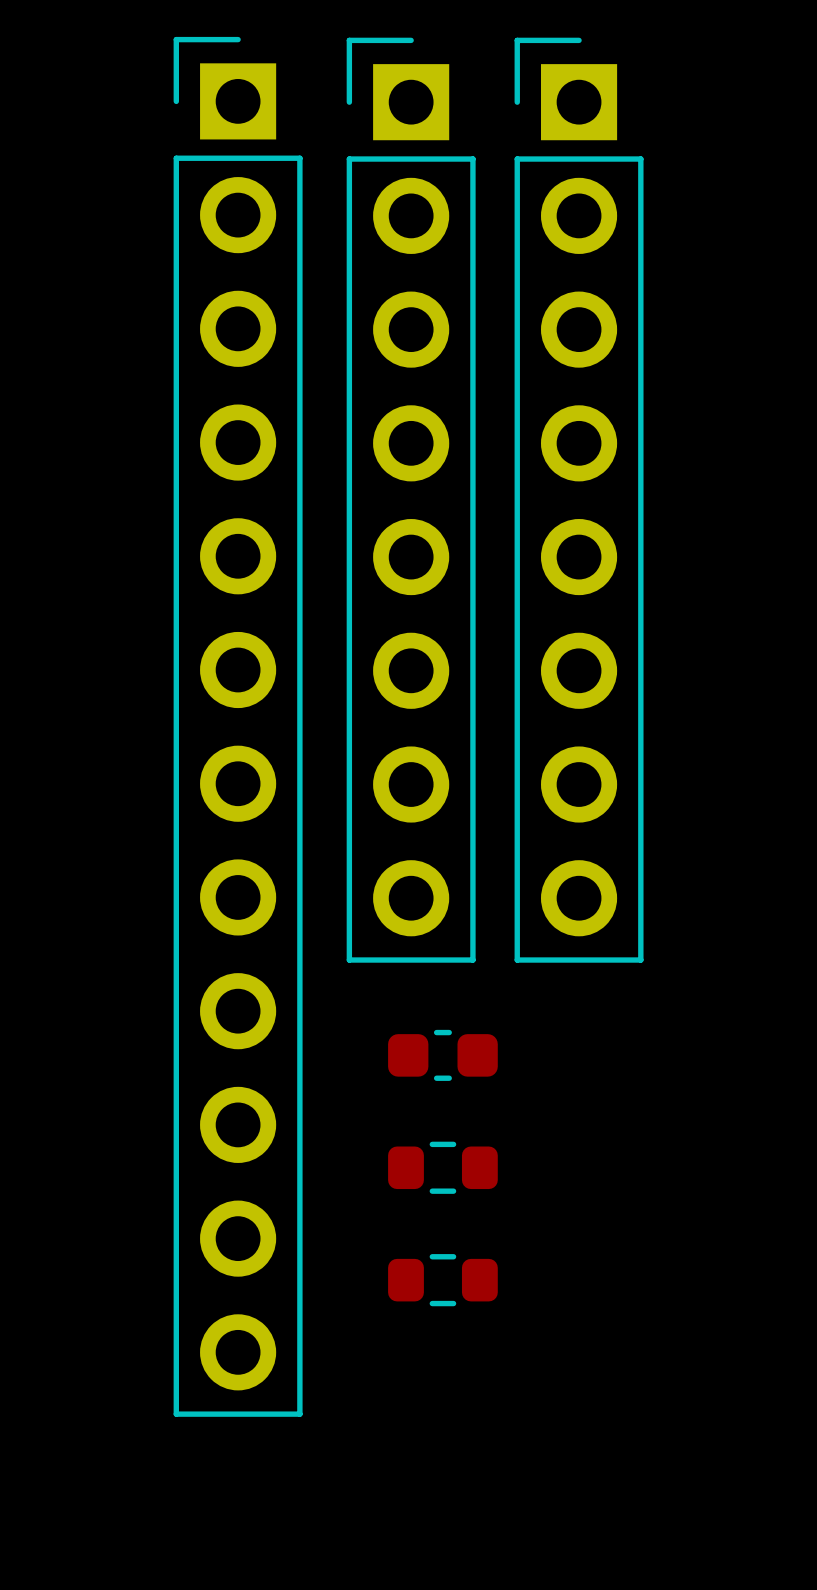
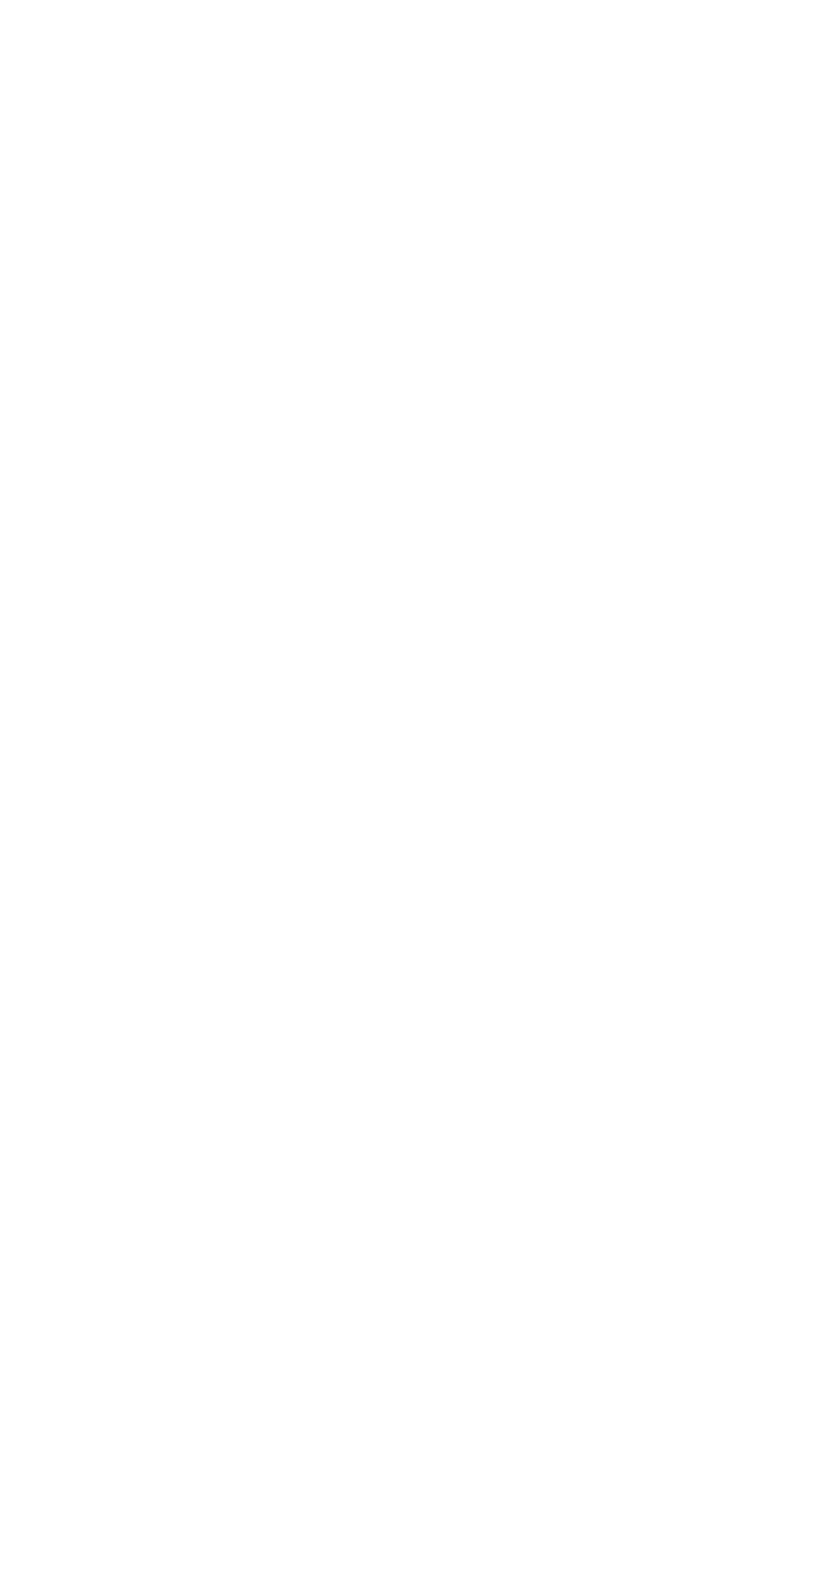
part: (411, 500) -> none
part: (579, 500) -> none
part: (238, 726) -> none
part: (442, 1055) -> none
part: (442, 1167) -> none
part: (442, 1280) -> none

